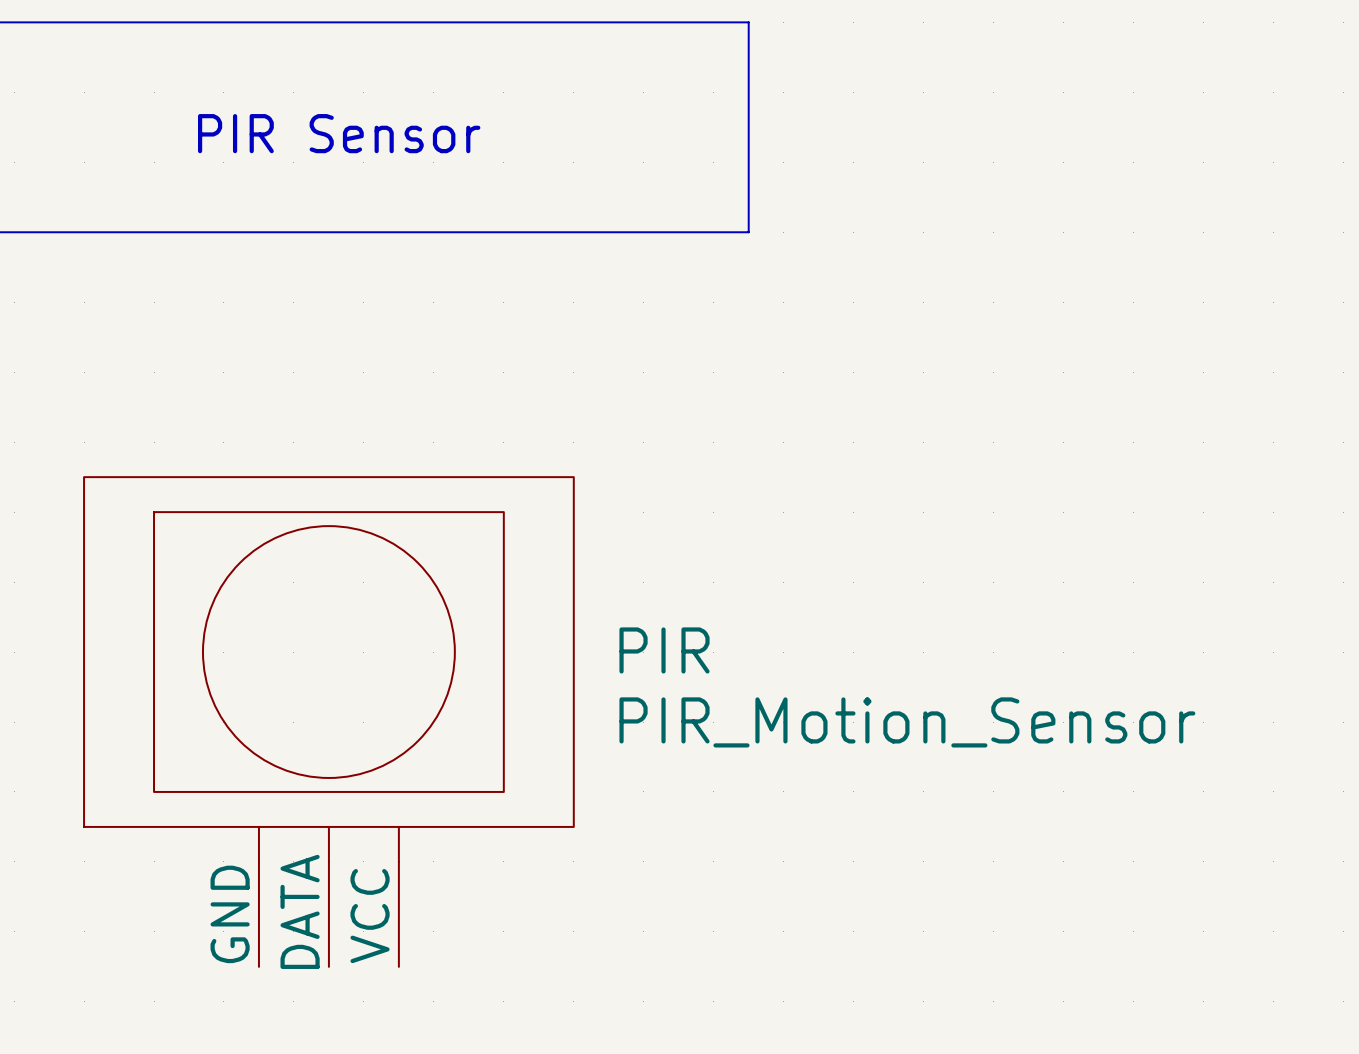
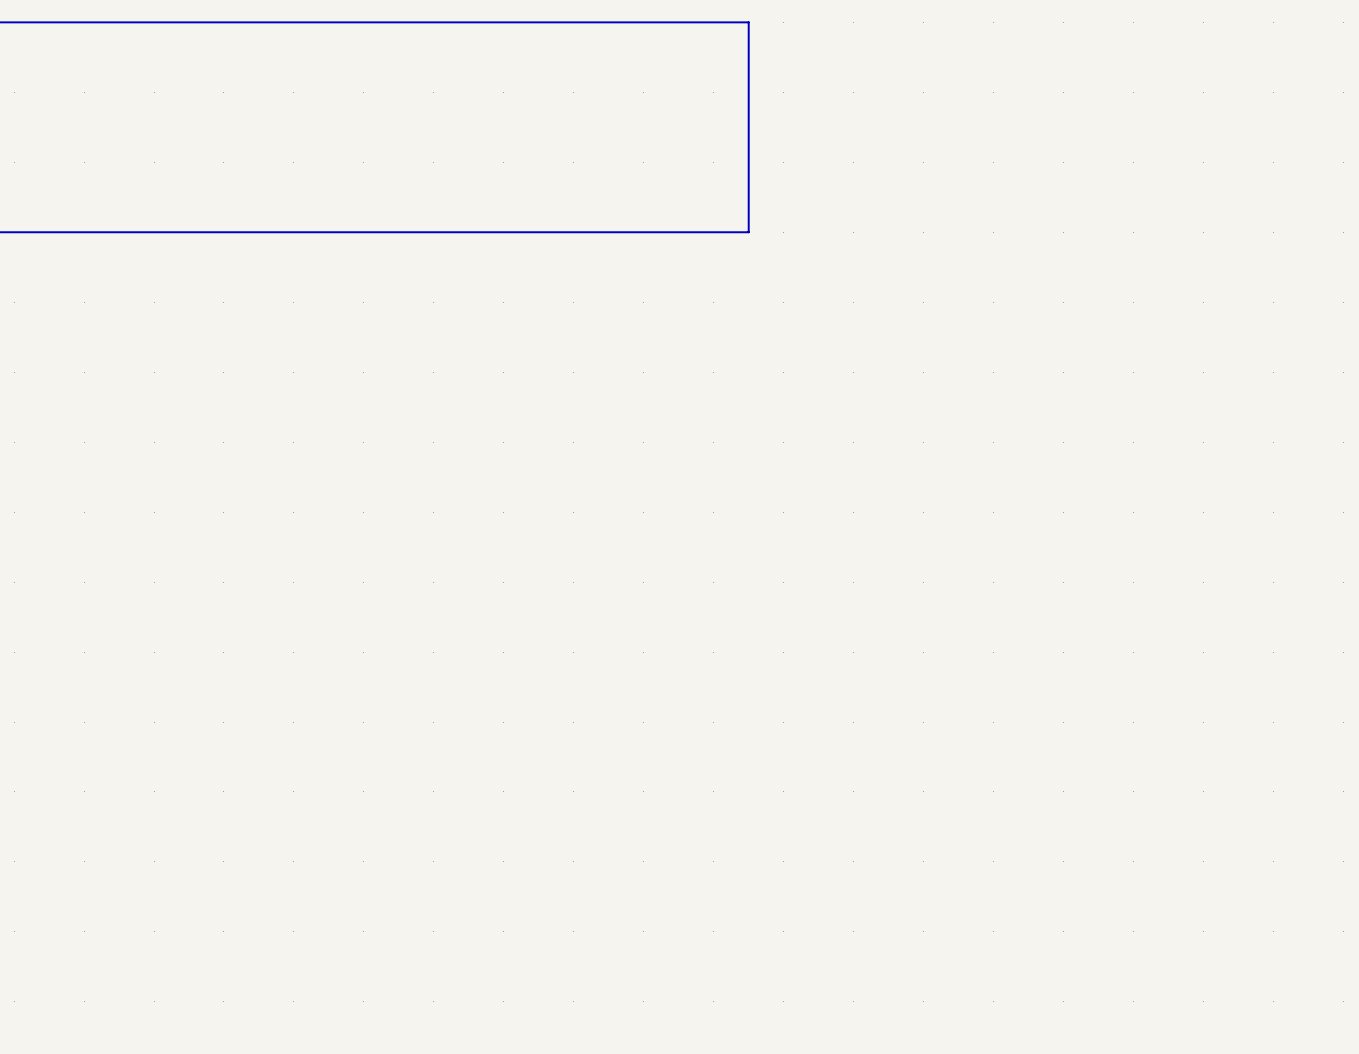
text: PIR Sensor (339, 133) -> none
PIR: PIR_Motion_Sensor (328, 722) -> none

